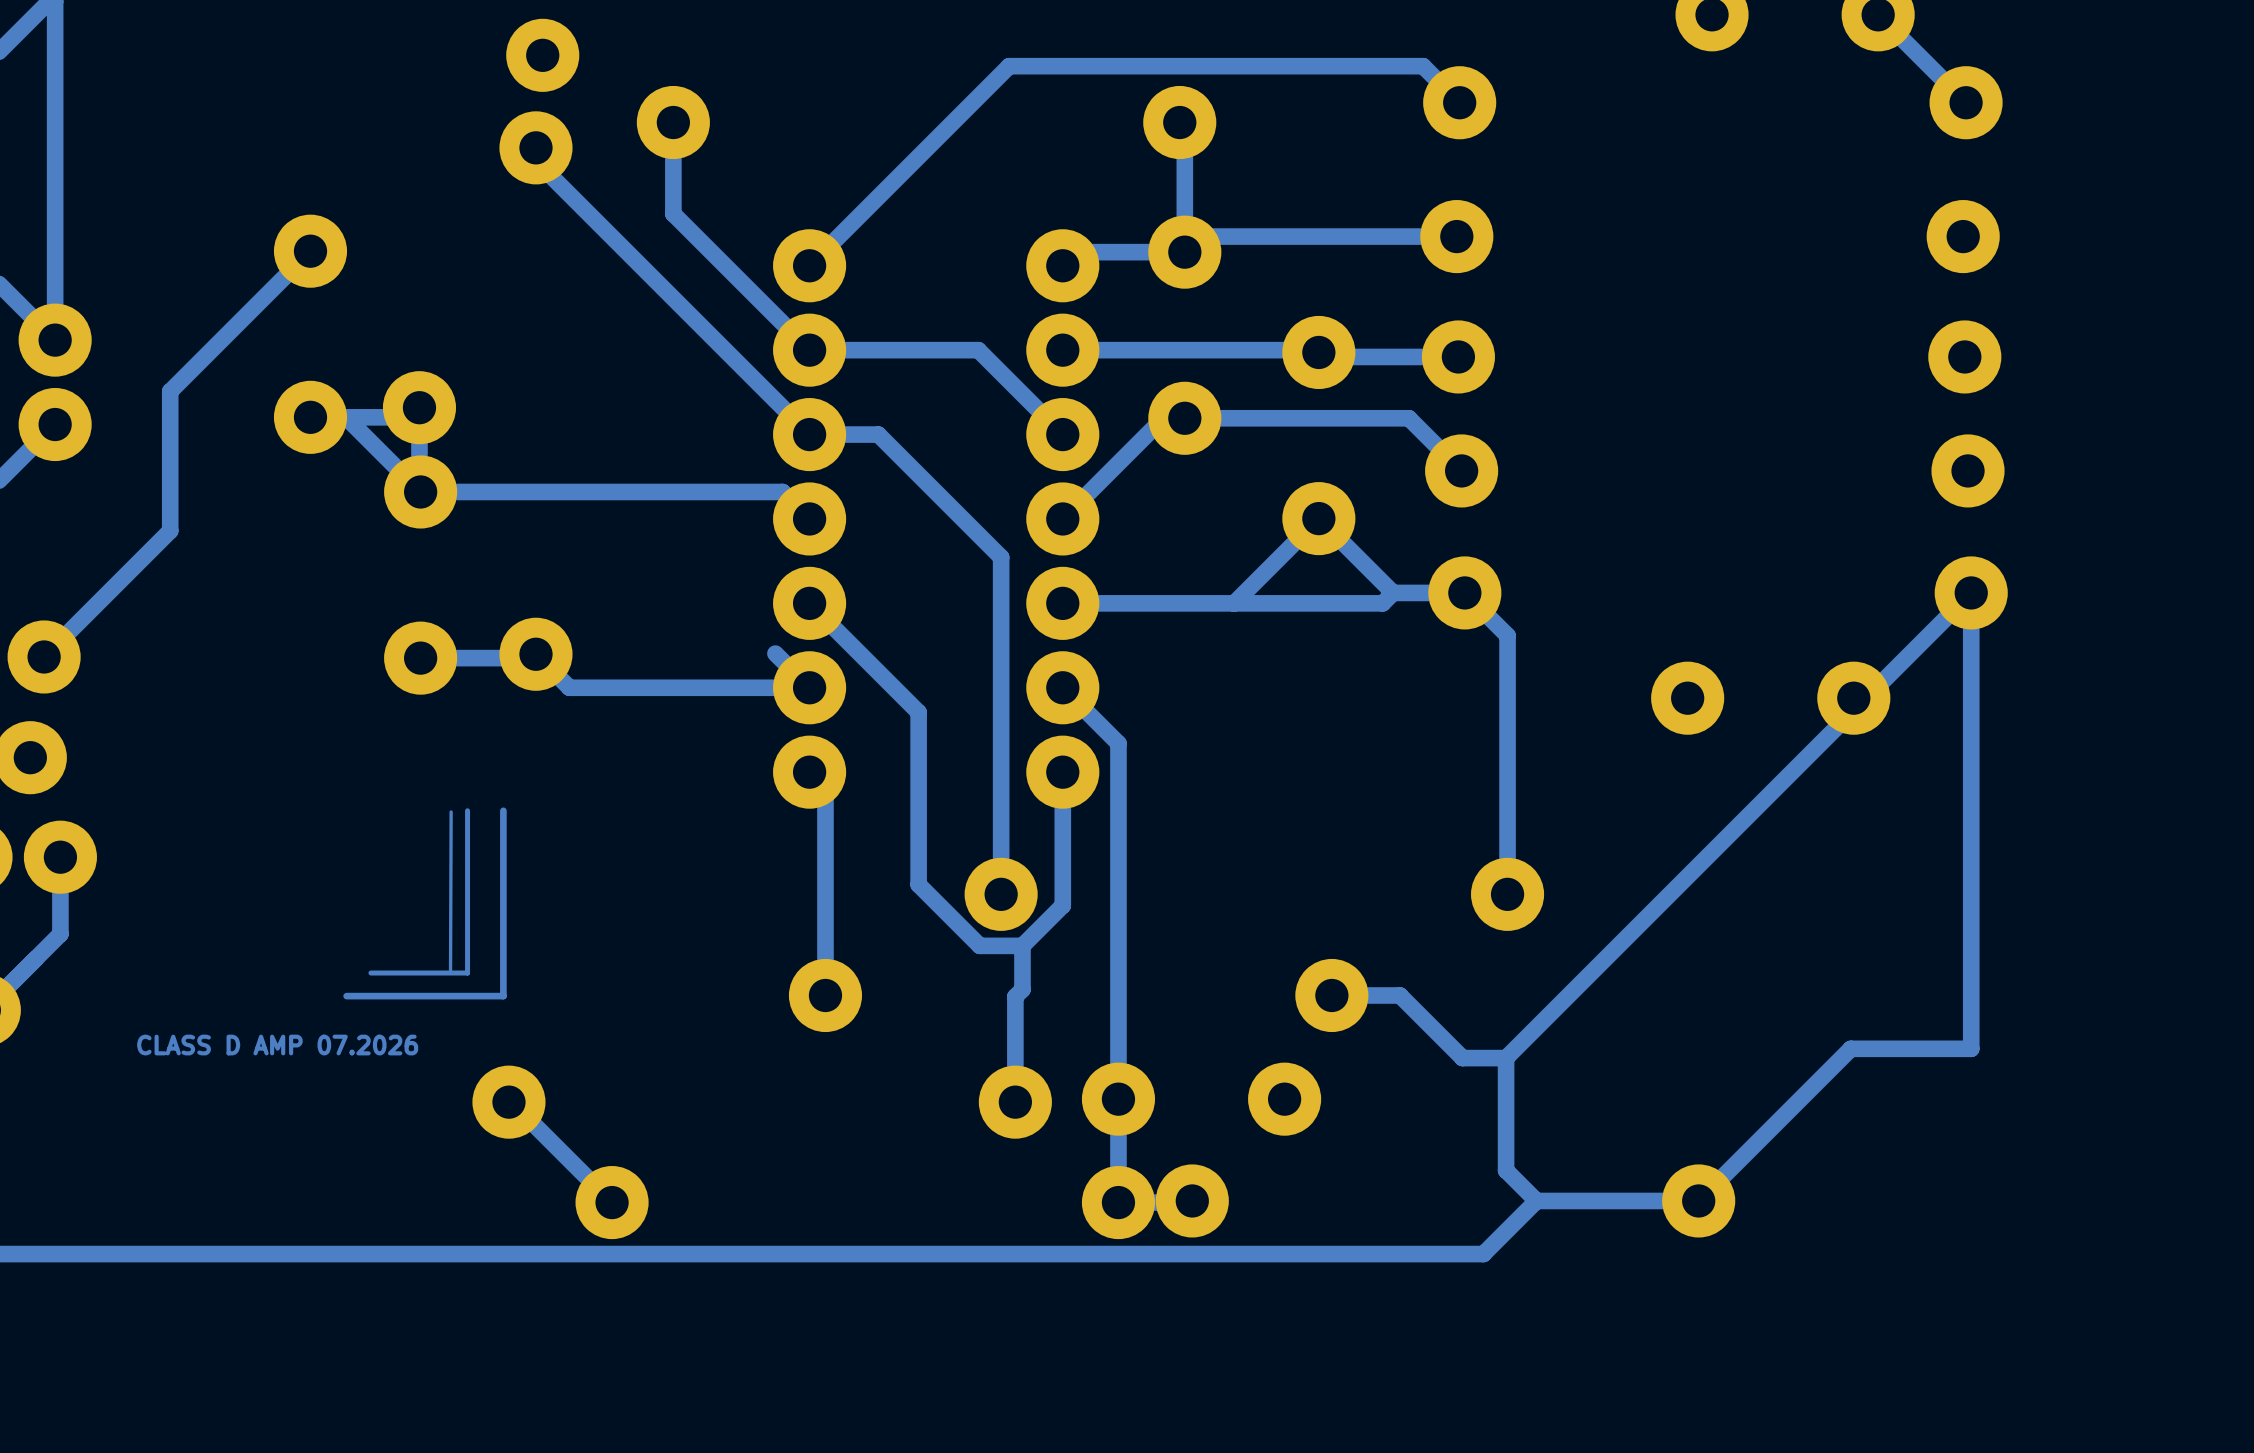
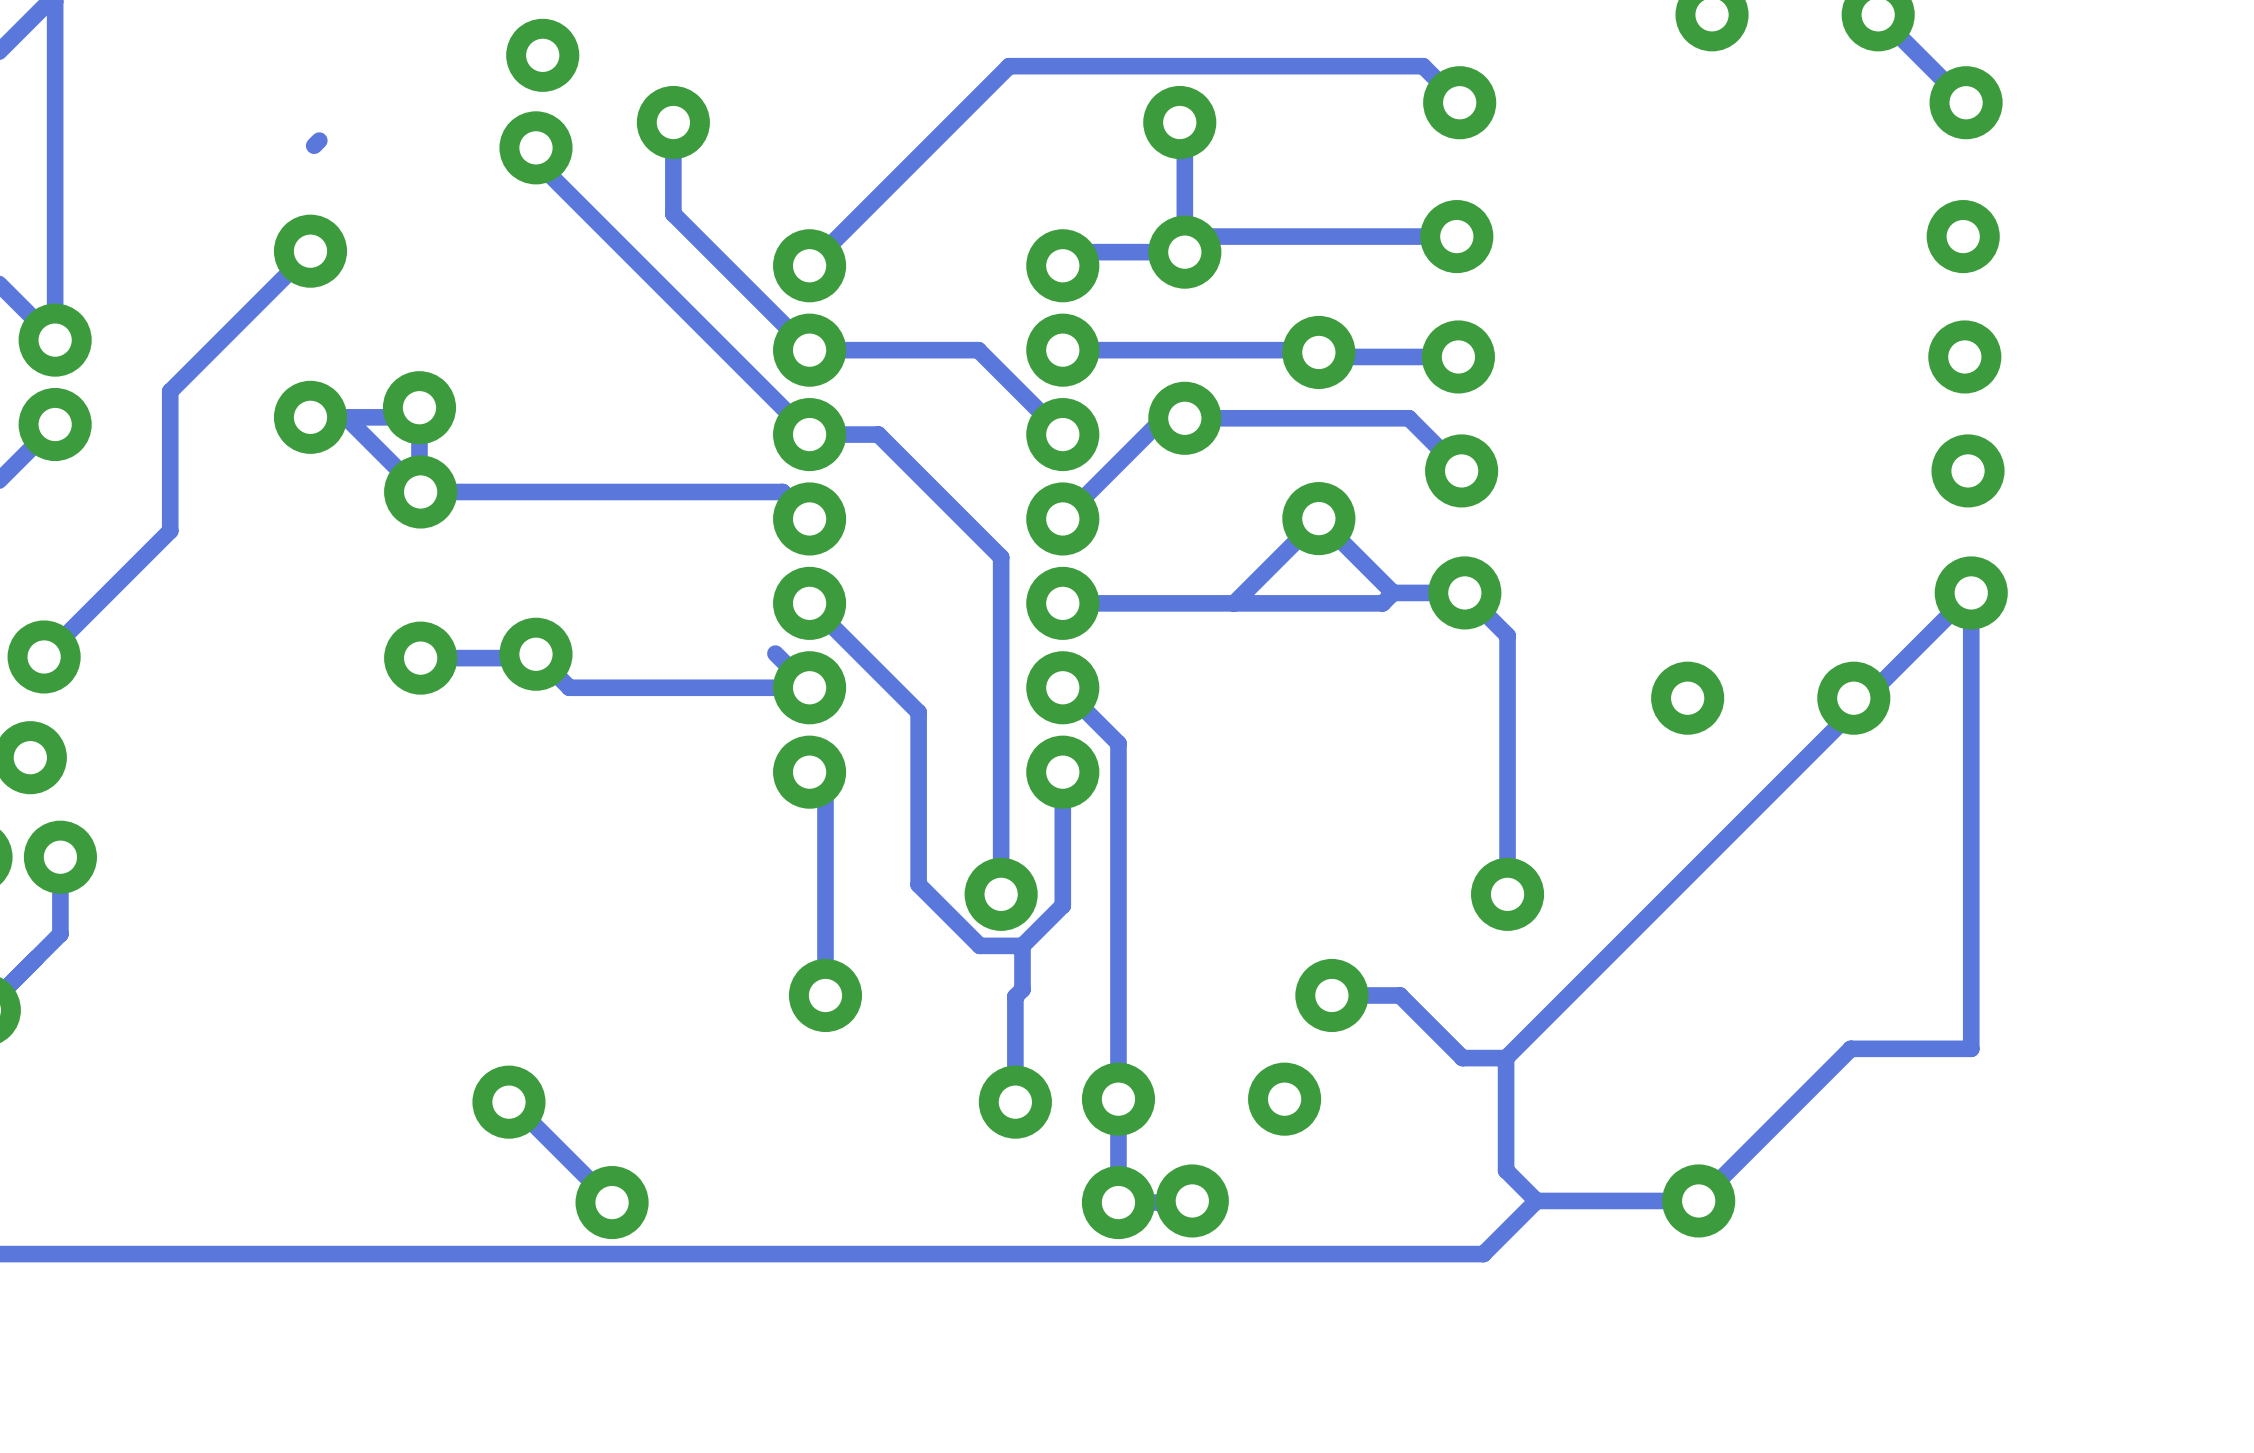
track: none -> (319, 140) (314, 145)
track: (467, 810) (467, 973) (370, 973) -> none
track: (503, 810) (503, 996) (346, 996) -> none
track: (451, 811) (450, 973) -> none
text: CLASS D AMP 07.2026 (277, 1045) -> none

